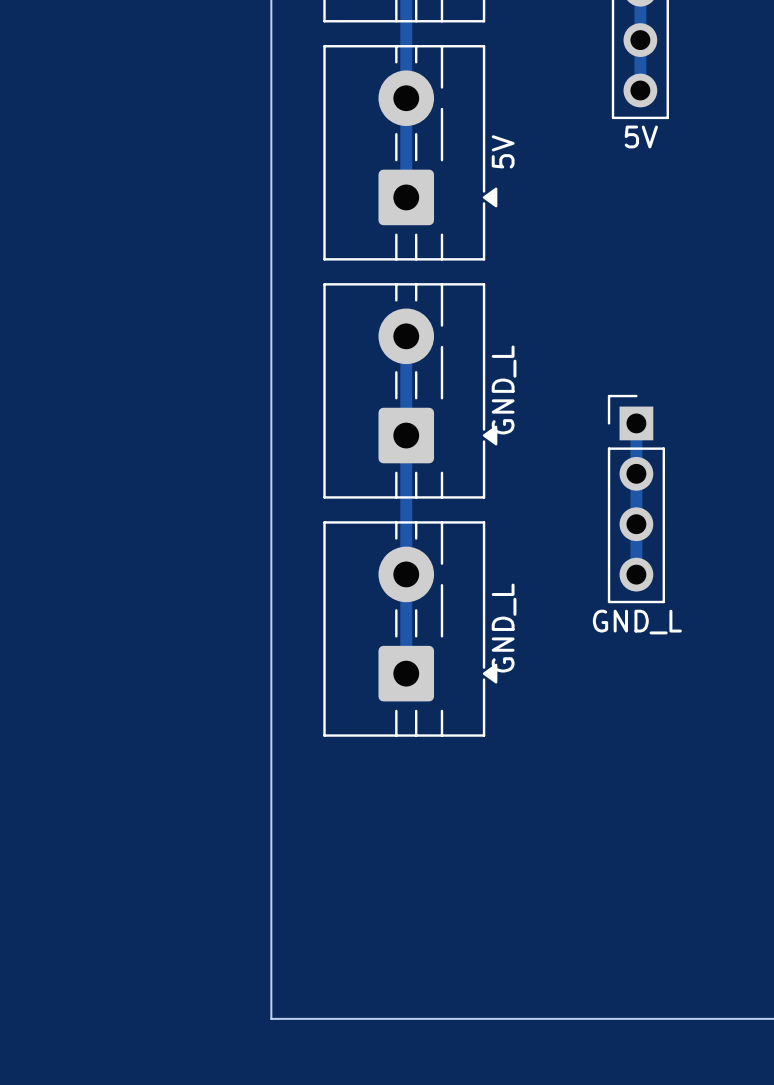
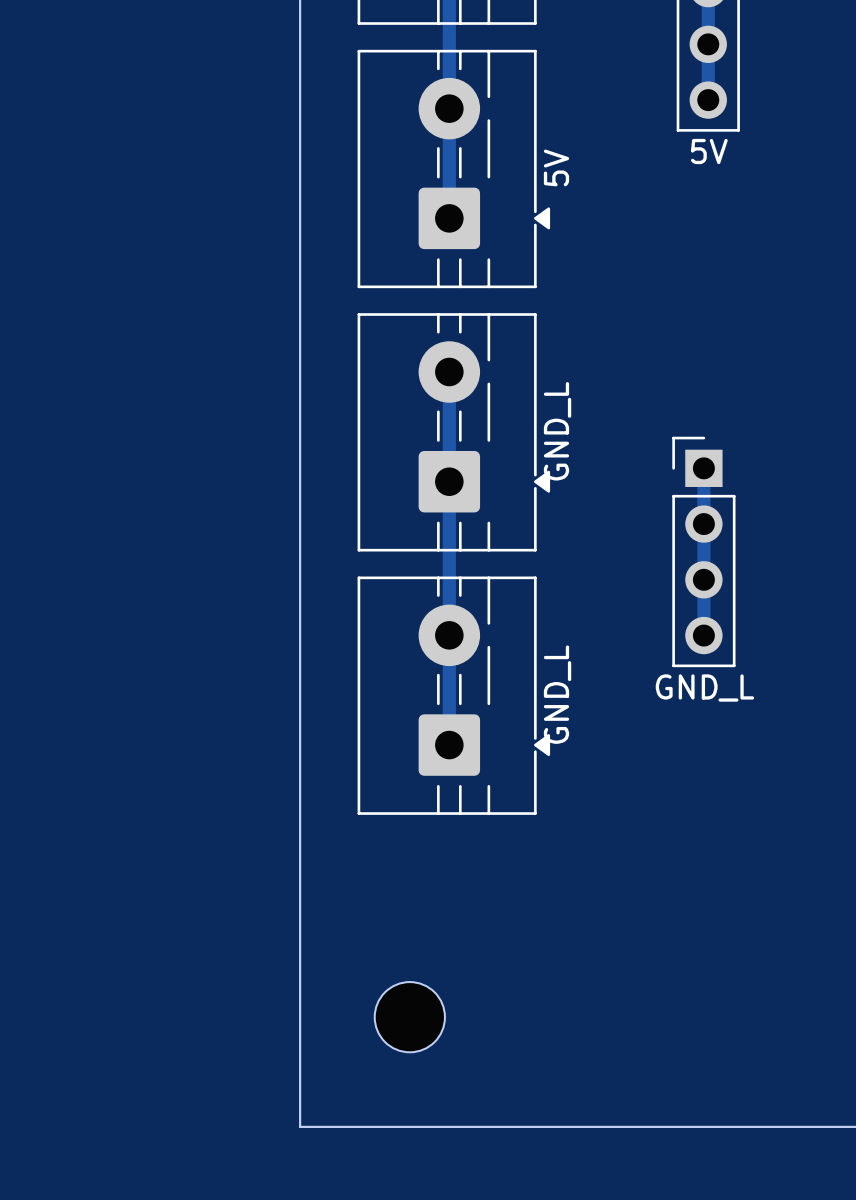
part: none -> (409, 1017)

